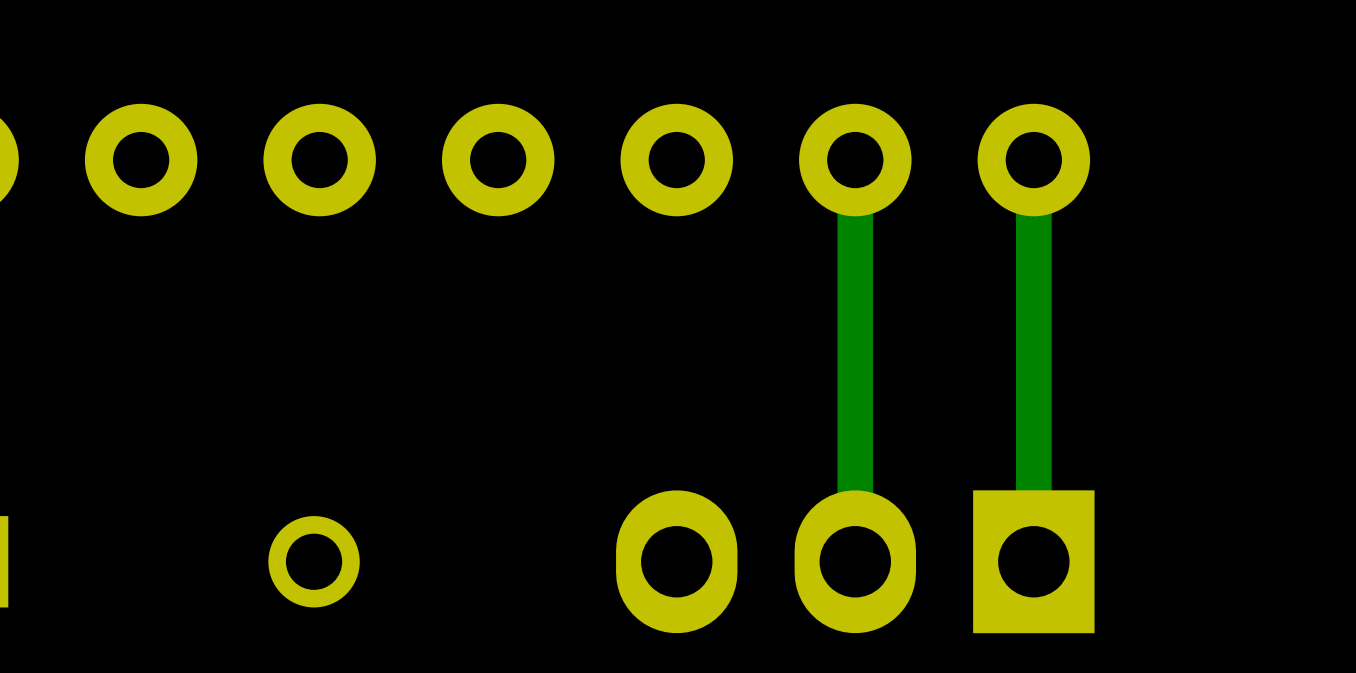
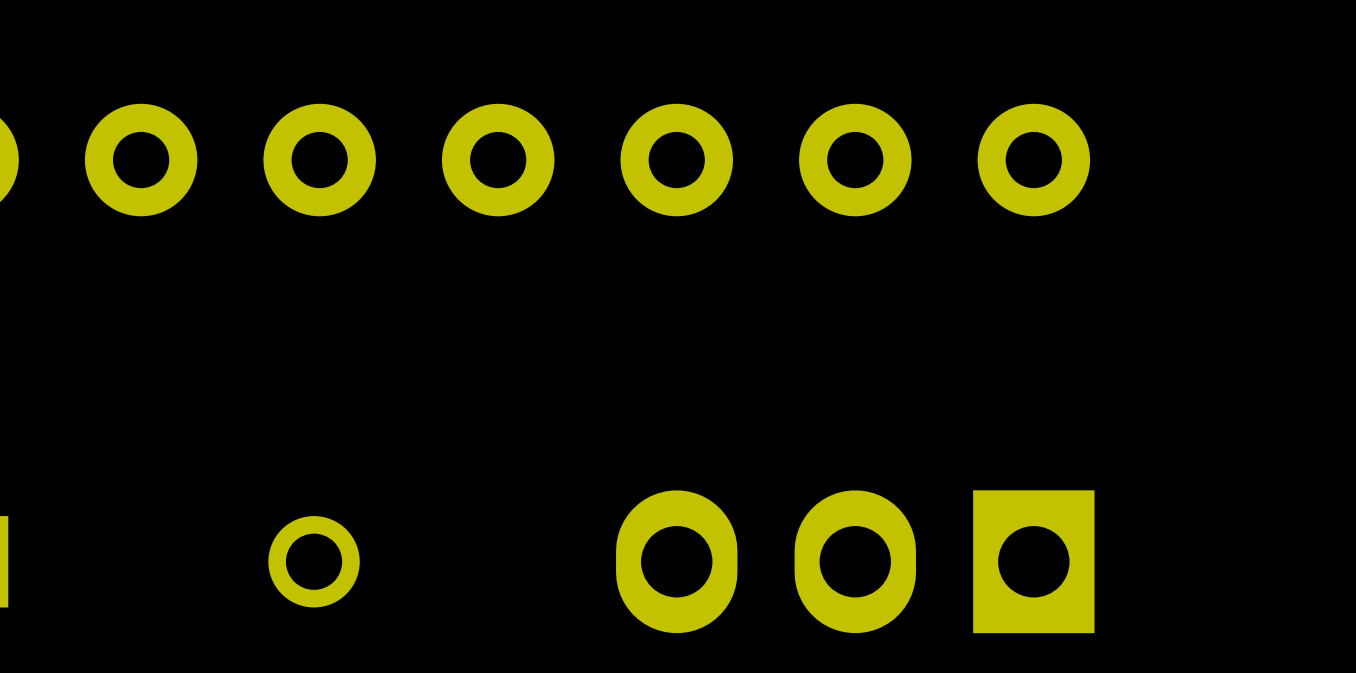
track: (855, 160) (855, 561) -> none
track: (1033, 160) (1033, 561) -> none

